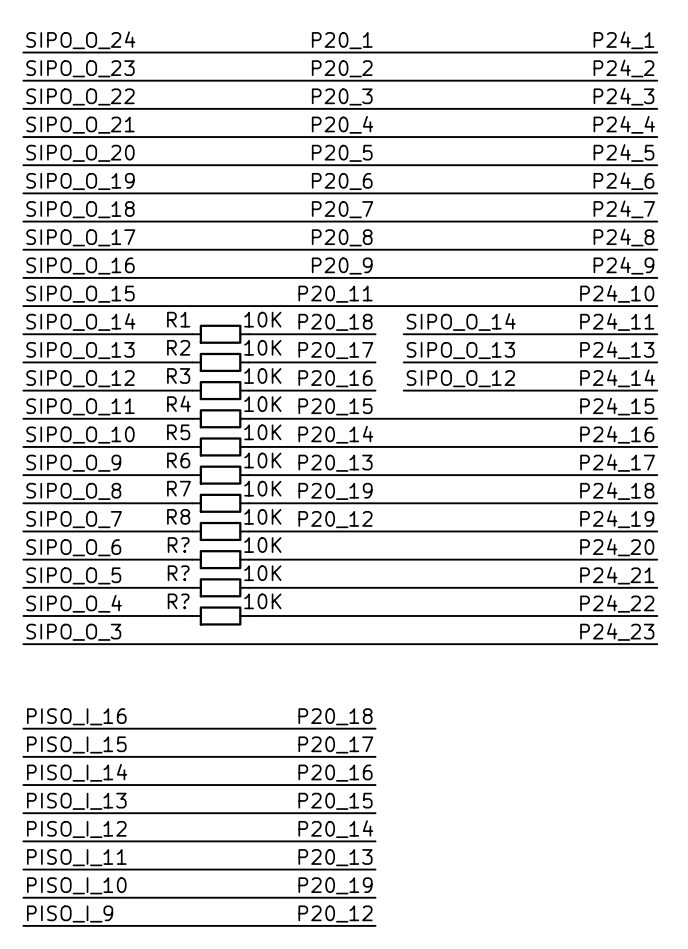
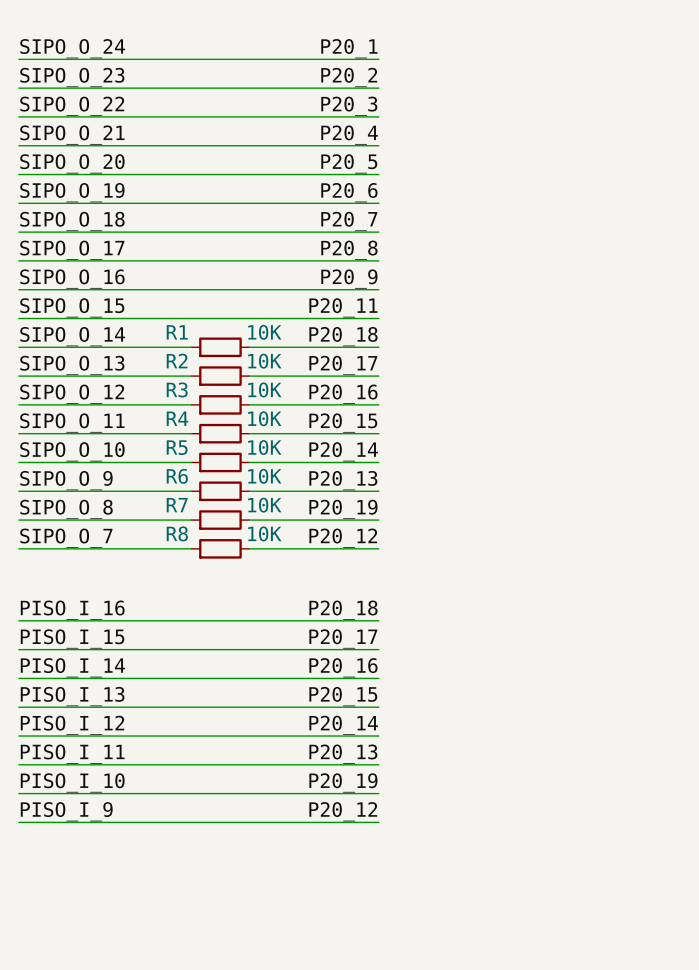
label: P24_1 (623, 40) -> none
wire: (375, 52) (657, 52) -> none
label: P24_2 (623, 68) -> none
wire: (375, 80) (657, 80) -> none
label: P24_3 (623, 96) -> none
wire: (375, 108) (657, 108) -> none
label: P24_4 (624, 124) -> none
wire: (375, 137) (657, 137) -> none
label: P24_5 (623, 152) -> none
wire: (375, 165) (657, 165) -> none
label: P24_6 (623, 181) -> none
wire: (375, 193) (657, 193) -> none
label: P24_7 (624, 209) -> none
wire: (375, 221) (657, 221) -> none
label: P24_8 (623, 237) -> none
wire: (375, 249) (657, 249) -> none
label: P24_9 (623, 265) -> none
wire: (375, 277) (657, 277) -> none
label: P24_10 (617, 293) -> none
wire: (375, 306) (657, 306) -> none
label: SIPO_O_14 (461, 322) -> none
label: P24_11 (617, 322) -> none
wire: (403, 334) (657, 334) -> none
label: SIPO_O_13 (460, 350) -> none
label: P24_13 (617, 350) -> none
wire: (403, 362) (657, 362) -> none
label: SIPO_O_12 (460, 378) -> none
label: P24_14 (617, 378) -> none
wire: (403, 390) (657, 390) -> none
label: P24_15 (617, 406) -> none
wire: (375, 418) (657, 418) -> none
label: P24_16 (617, 434) -> none
wire: (375, 446) (657, 446) -> none
label: P24_17 (617, 462) -> none
wire: (375, 475) (657, 475) -> none
label: P24_18 (617, 491) -> none
wire: (375, 503) (657, 503) -> none
label: P24_19 (617, 519) -> none
wire: (375, 531) (657, 531) -> none
label: SIPO_O_6 (73, 547) -> none
label: P24_20 (617, 547) -> none
wire: (23, 559) (192, 559) -> none
R?: 10K (220, 559) -> none
wire: (248, 559) (657, 559) -> none
label: SIPO_O_5 (73, 575) -> none
label: P24_21 (617, 575) -> none
wire: (23, 587) (192, 587) -> none
R?: 10K (220, 587) -> none
wire: (248, 587) (657, 587) -> none
label: SIPO_O_4 (74, 603) -> none
label: P24_22 (617, 603) -> none
wire: (23, 615) (192, 615) -> none
R?: 10K (220, 615) -> none
wire: (248, 615) (657, 615) -> none
label: P24_23 (617, 631) -> none
label: SIPO_O_3 (73, 632) -> none
wire: (23, 644) (657, 644) -> none
label position: PISO_I_16 (76, 716) -> PISO_I_16 (72, 610)
label position: P20_18 (335, 716) -> P20_18 (343, 610)
wire: (23, 728) (375, 728) -> (18, 620) (378, 620)
label position: PISO_I_15 (76, 744) -> PISO_I_15 (72, 638)
label position: P20_17 (335, 744) -> P20_17 (343, 638)
wire: (23, 756) (375, 756) -> (18, 649) (378, 649)
label position: PISO_I_14 (77, 772) -> PISO_I_14 (72, 667)
label position: P20_16 (335, 773) -> P20_16 (343, 667)
wire: (23, 785) (375, 785) -> (18, 678) (378, 678)
label position: PISO_I_13 (76, 801) -> PISO_I_13 (72, 696)
label position: P20_15 (335, 801) -> P20_15 (343, 696)
wire: (23, 813) (375, 813) -> (18, 707) (378, 707)
label position: PISO_I_12 (76, 829) -> PISO_I_12 (72, 725)
label position: P20_14 (335, 829) -> P20_14 (343, 725)
wire: (23, 841) (375, 841) -> (18, 736) (378, 736)
label position: PISO_I_11 (76, 857) -> PISO_I_11 (72, 754)
label position: P20_13 (335, 857) -> P20_13 (343, 754)
wire: (23, 869) (375, 869) -> (18, 764) (378, 764)
label position: PISO_I_10 (76, 885) -> PISO_I_10 (72, 782)
label position: P20_19 (335, 885) -> P20_19 (343, 782)
wire: (23, 897) (375, 897) -> (18, 793) (378, 793)
label position: PISO_I_9 (70, 914) -> PISO_I_9 (66, 811)
label position: P20_12 (335, 914) -> P20_12 (343, 811)
wire: (23, 925) (375, 925) -> (18, 822) (378, 822)

